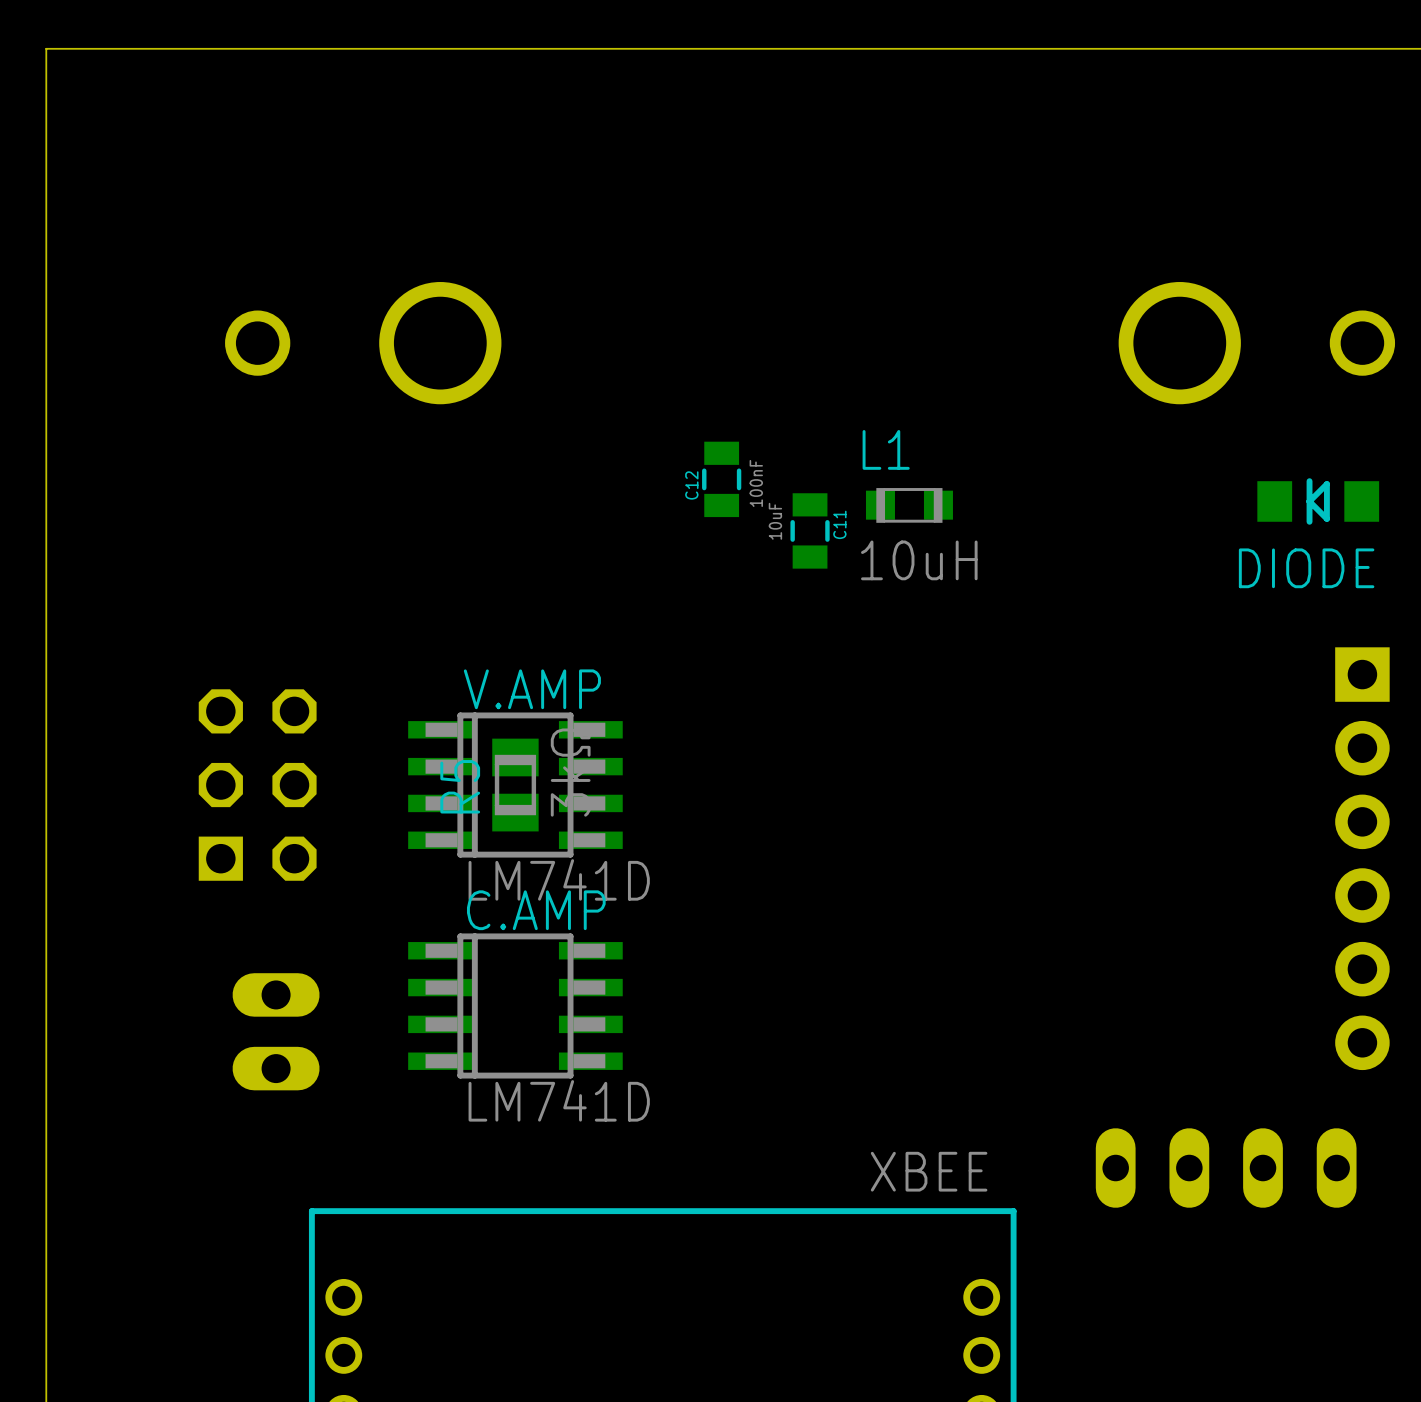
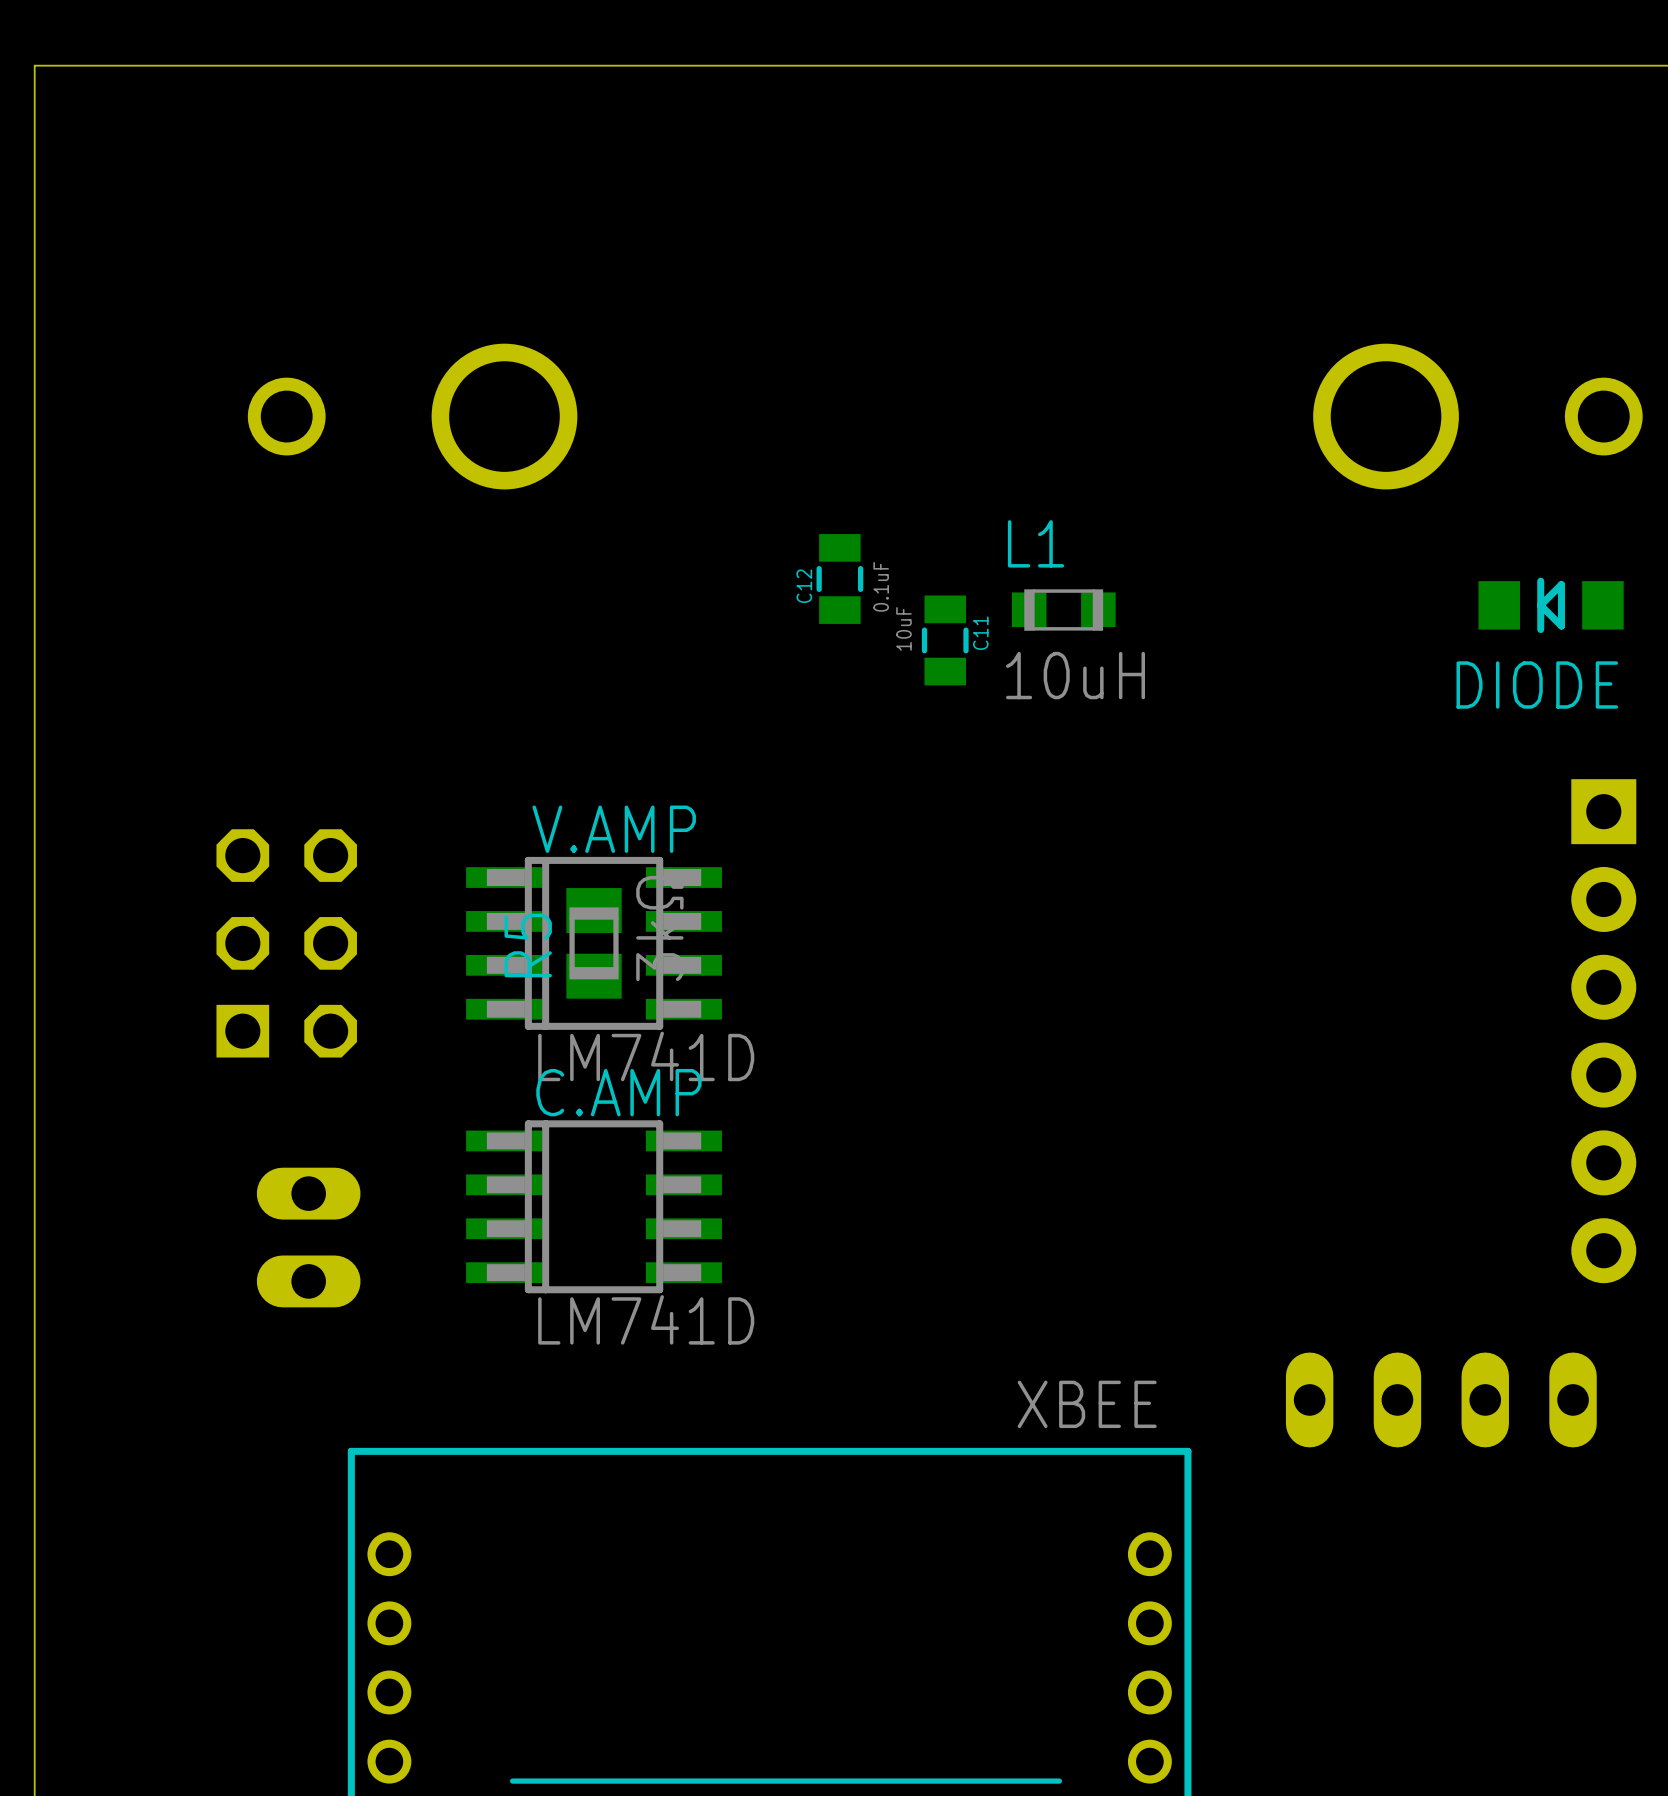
C12 value: 100nF (756, 483) -> 0.1uF (881, 586)

